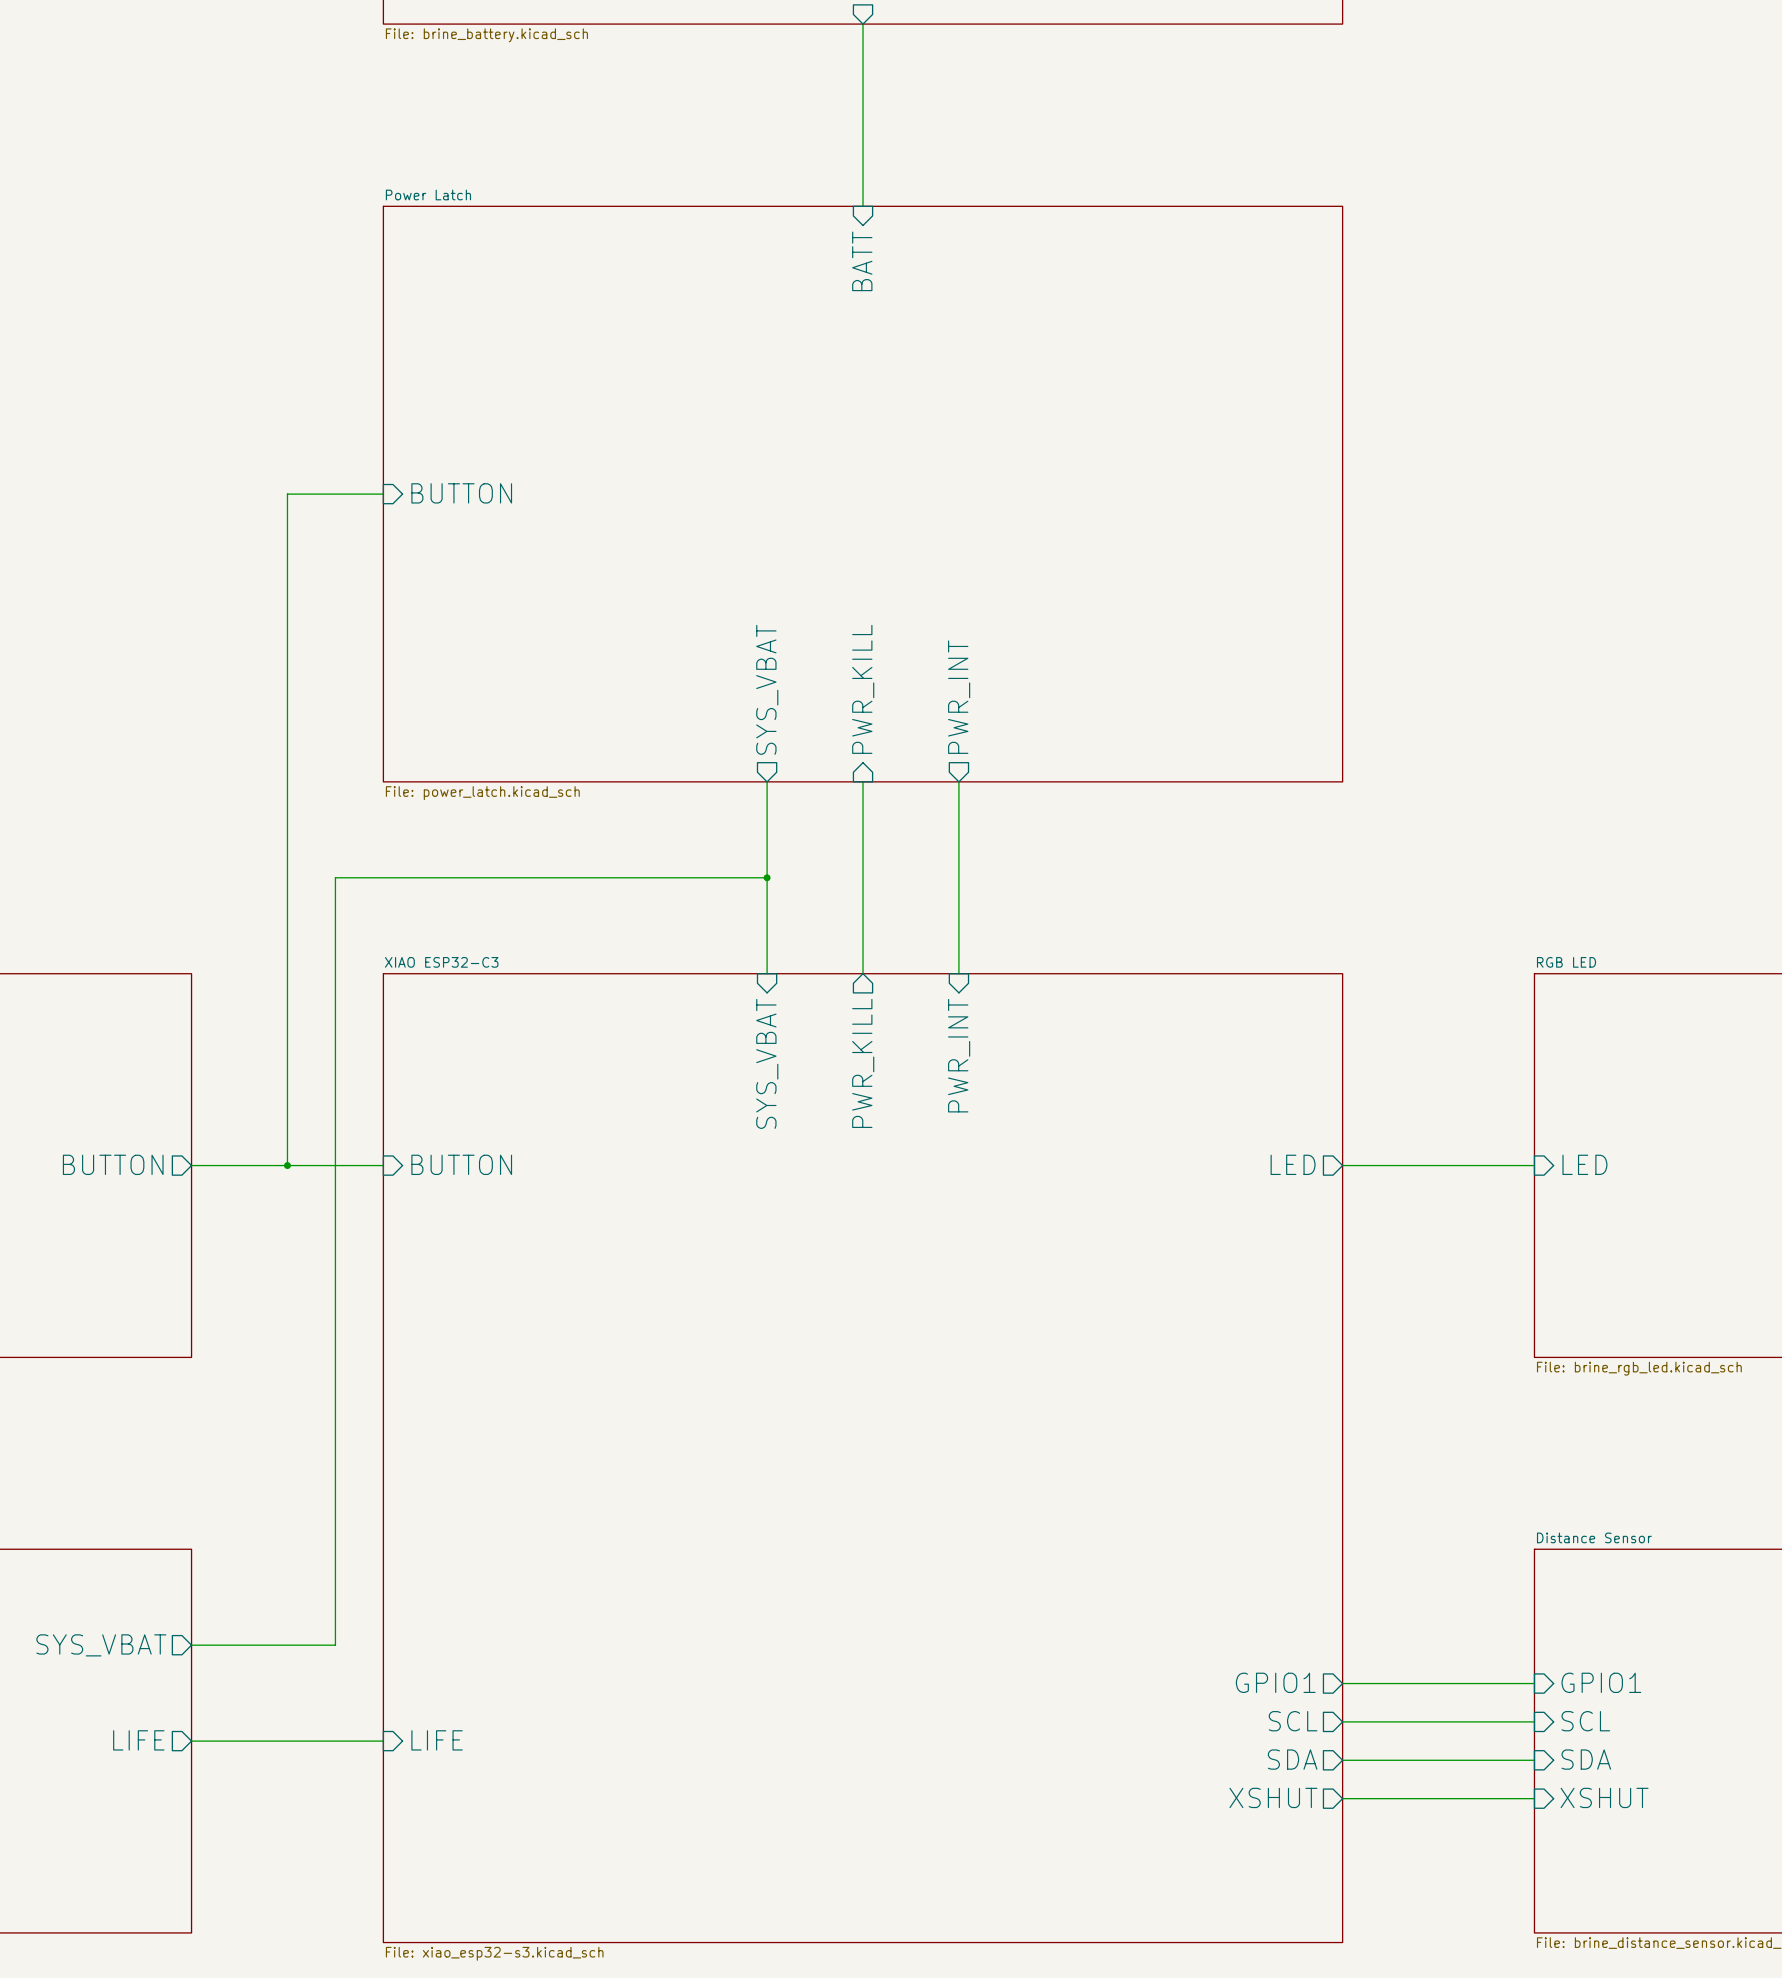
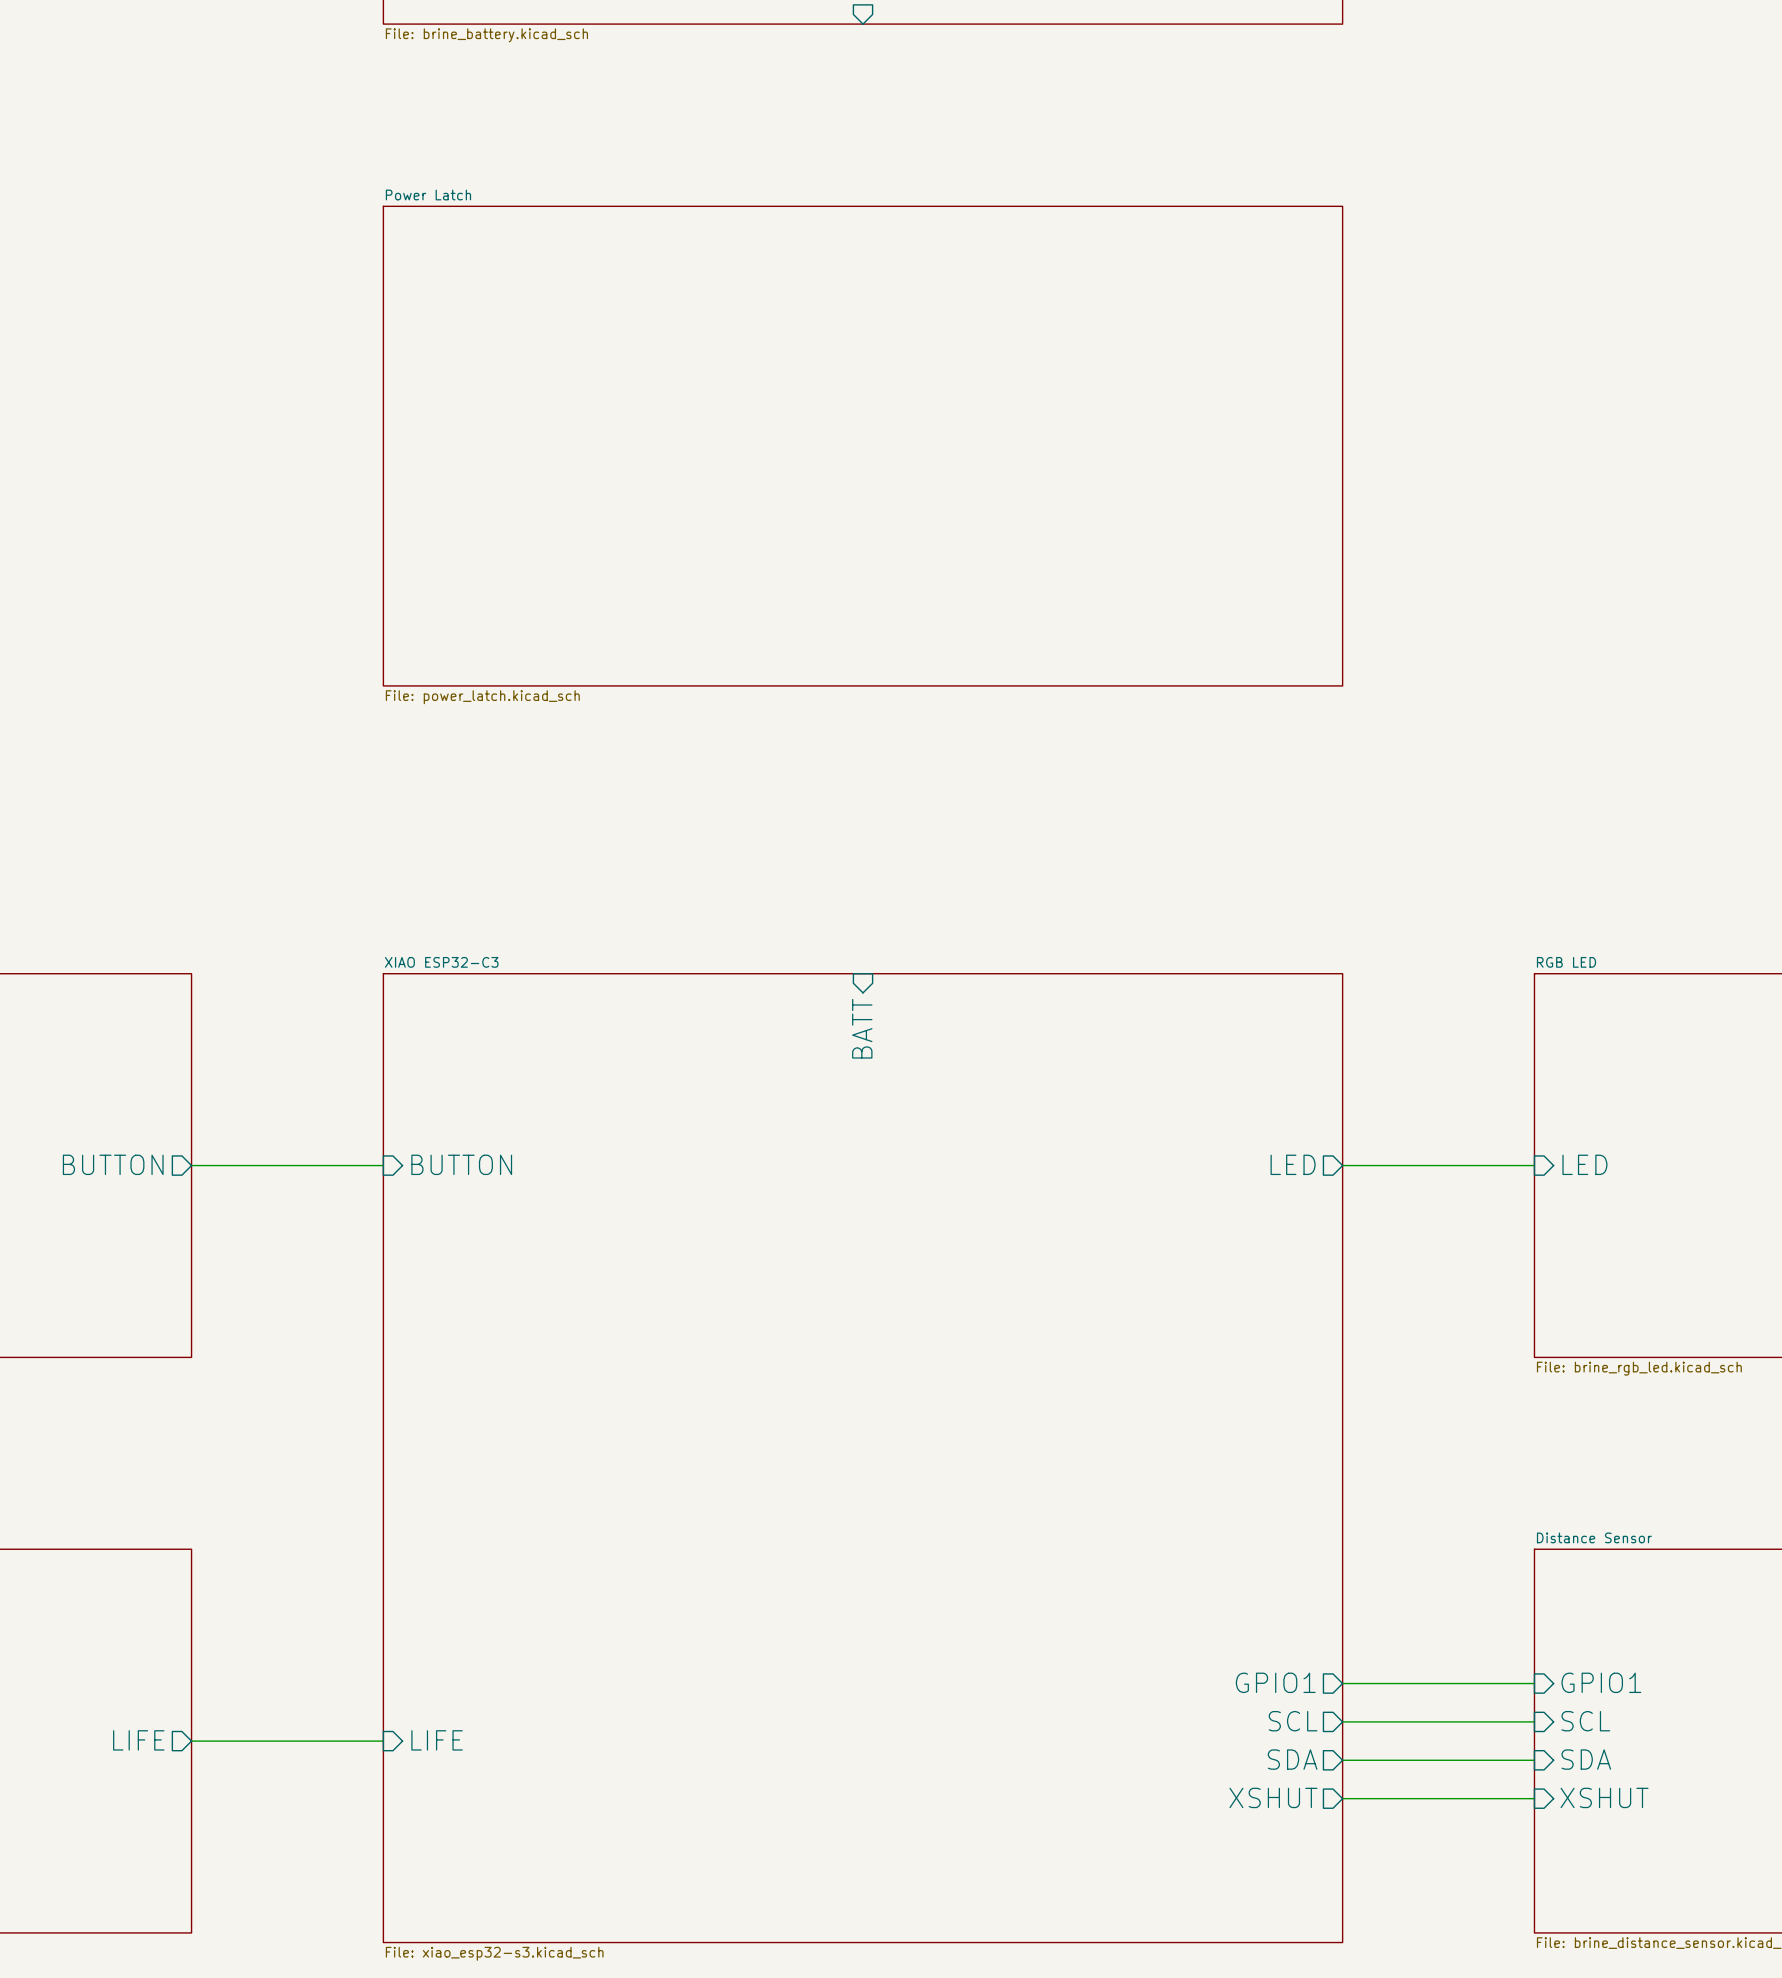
wire: (863, 24) (863, 206) -> none
sheet pin: BATT (862, 261) -> none
sheet Power Latch: none -> File: power_latch.kicad_sch (863, 446)
sheet pin: BUTTON (461, 493) -> none
wire: (383, 494) (287, 494) (287, 1165) -> none
sheet Power Latch: File: power_latch.kicad_sch (863, 494) -> none
sheet pin: SYS_VBAT (767, 689) -> none
sheet pin: PWR_KILL (863, 689) -> none
sheet pin: PWR_INT (959, 697) -> none
wire: (767, 781) (767, 973) -> none
wire: (863, 781) (863, 973) -> none
wire: (958, 781) (958, 973) -> none
wire: (767, 877) (335, 877) (335, 1645) (191, 1645) -> none
junction: (767, 877) -> none
sheet pin: PWR_INT (959, 1055) -> none
sheet pin: SYS_VBAT (767, 1063) -> none
sheet pin shape: output (863, 1063) -> input (862, 1028)
sheet pin: PWR_KILL (863, 1063) -> BATT (862, 1028)
junction: (287, 1165) -> none
sheet pin: SYS_VBAT (101, 1645) -> none

